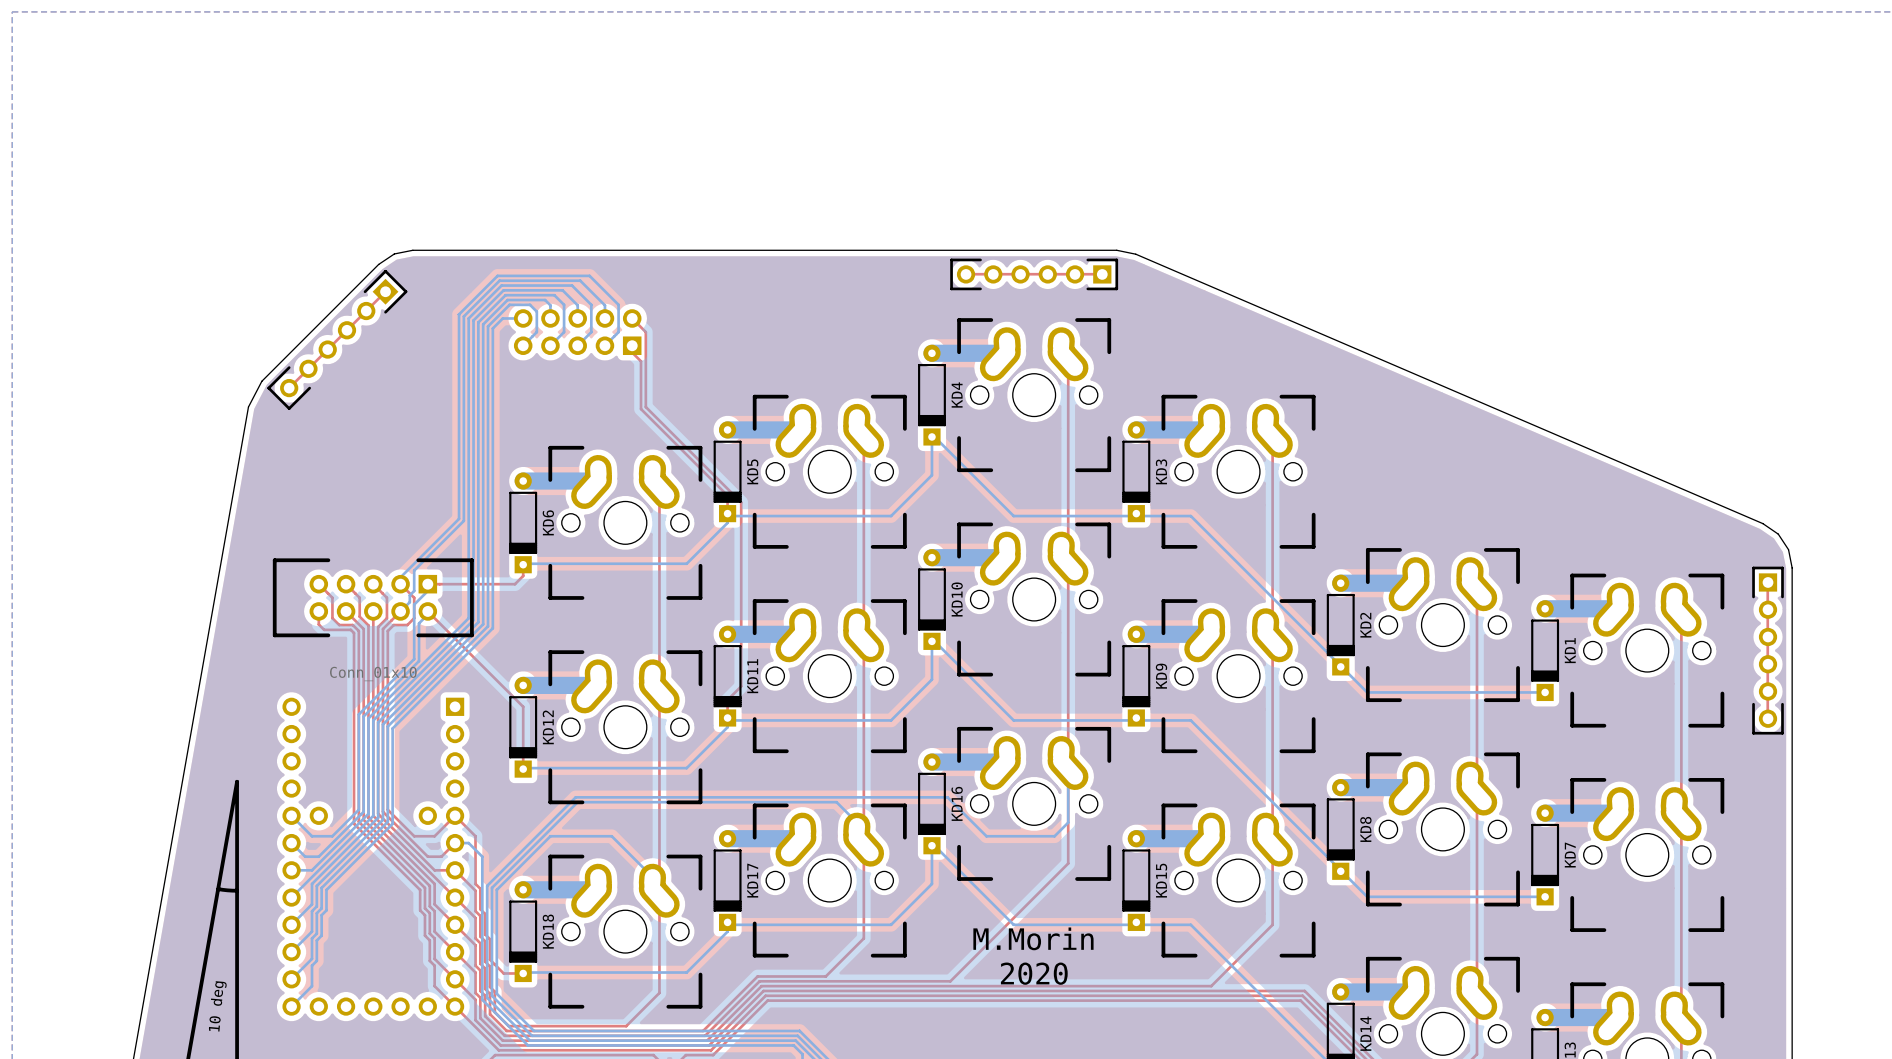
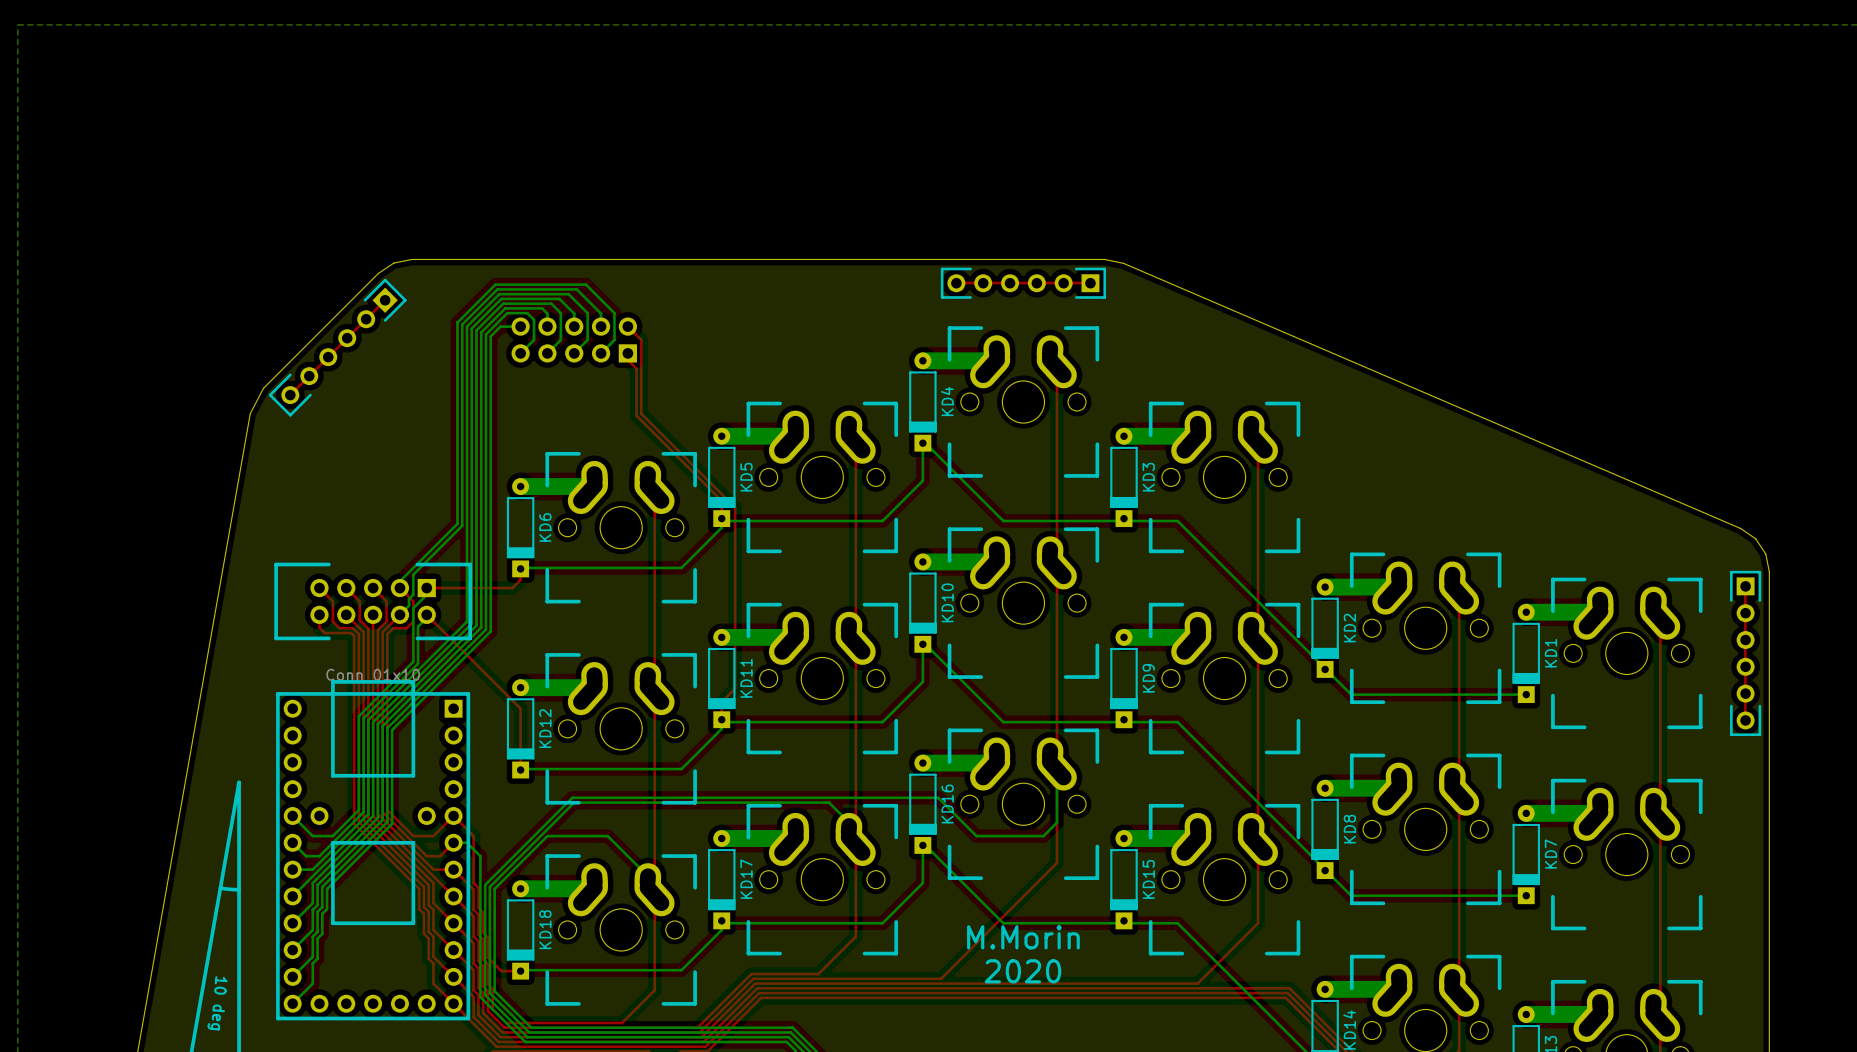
part footprint: [282, 697, 465, 1016] -> [276, 680, 471, 1021]
text rotation: 0° (217, 1006) -> 180° (217, 1003)

